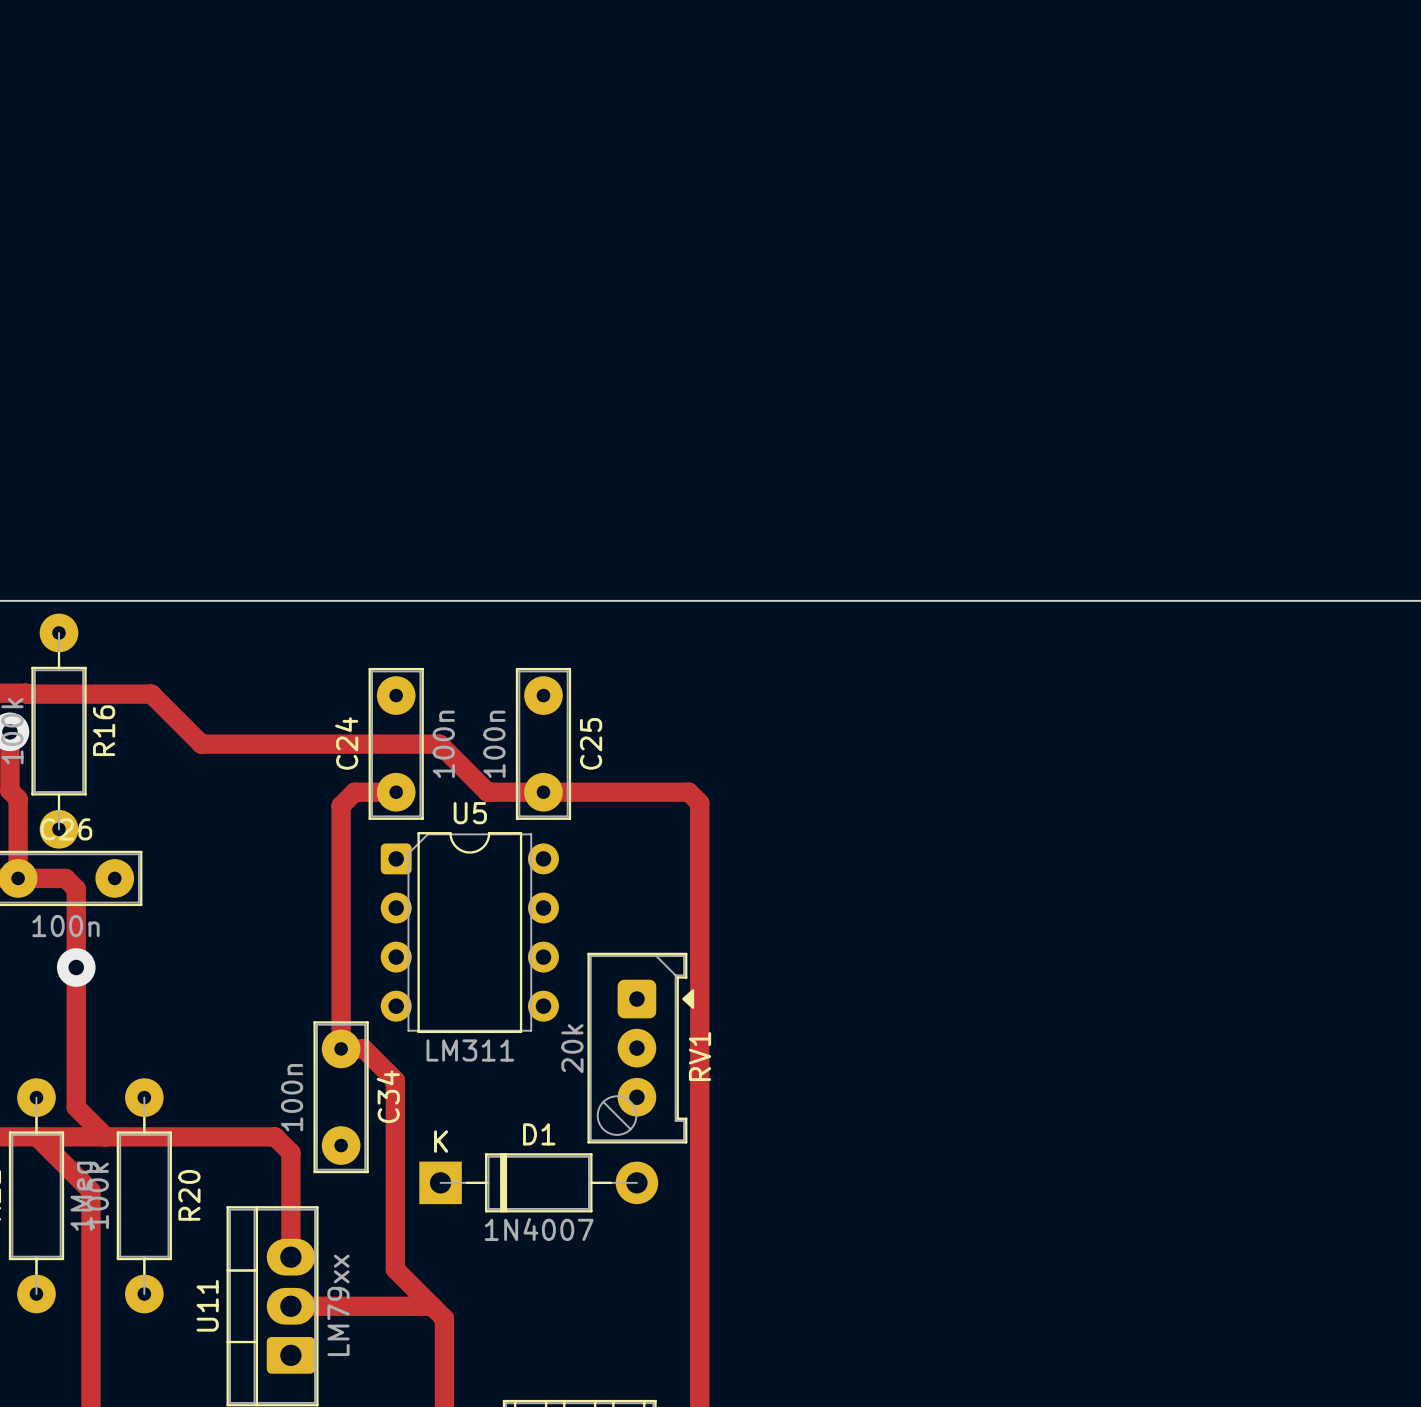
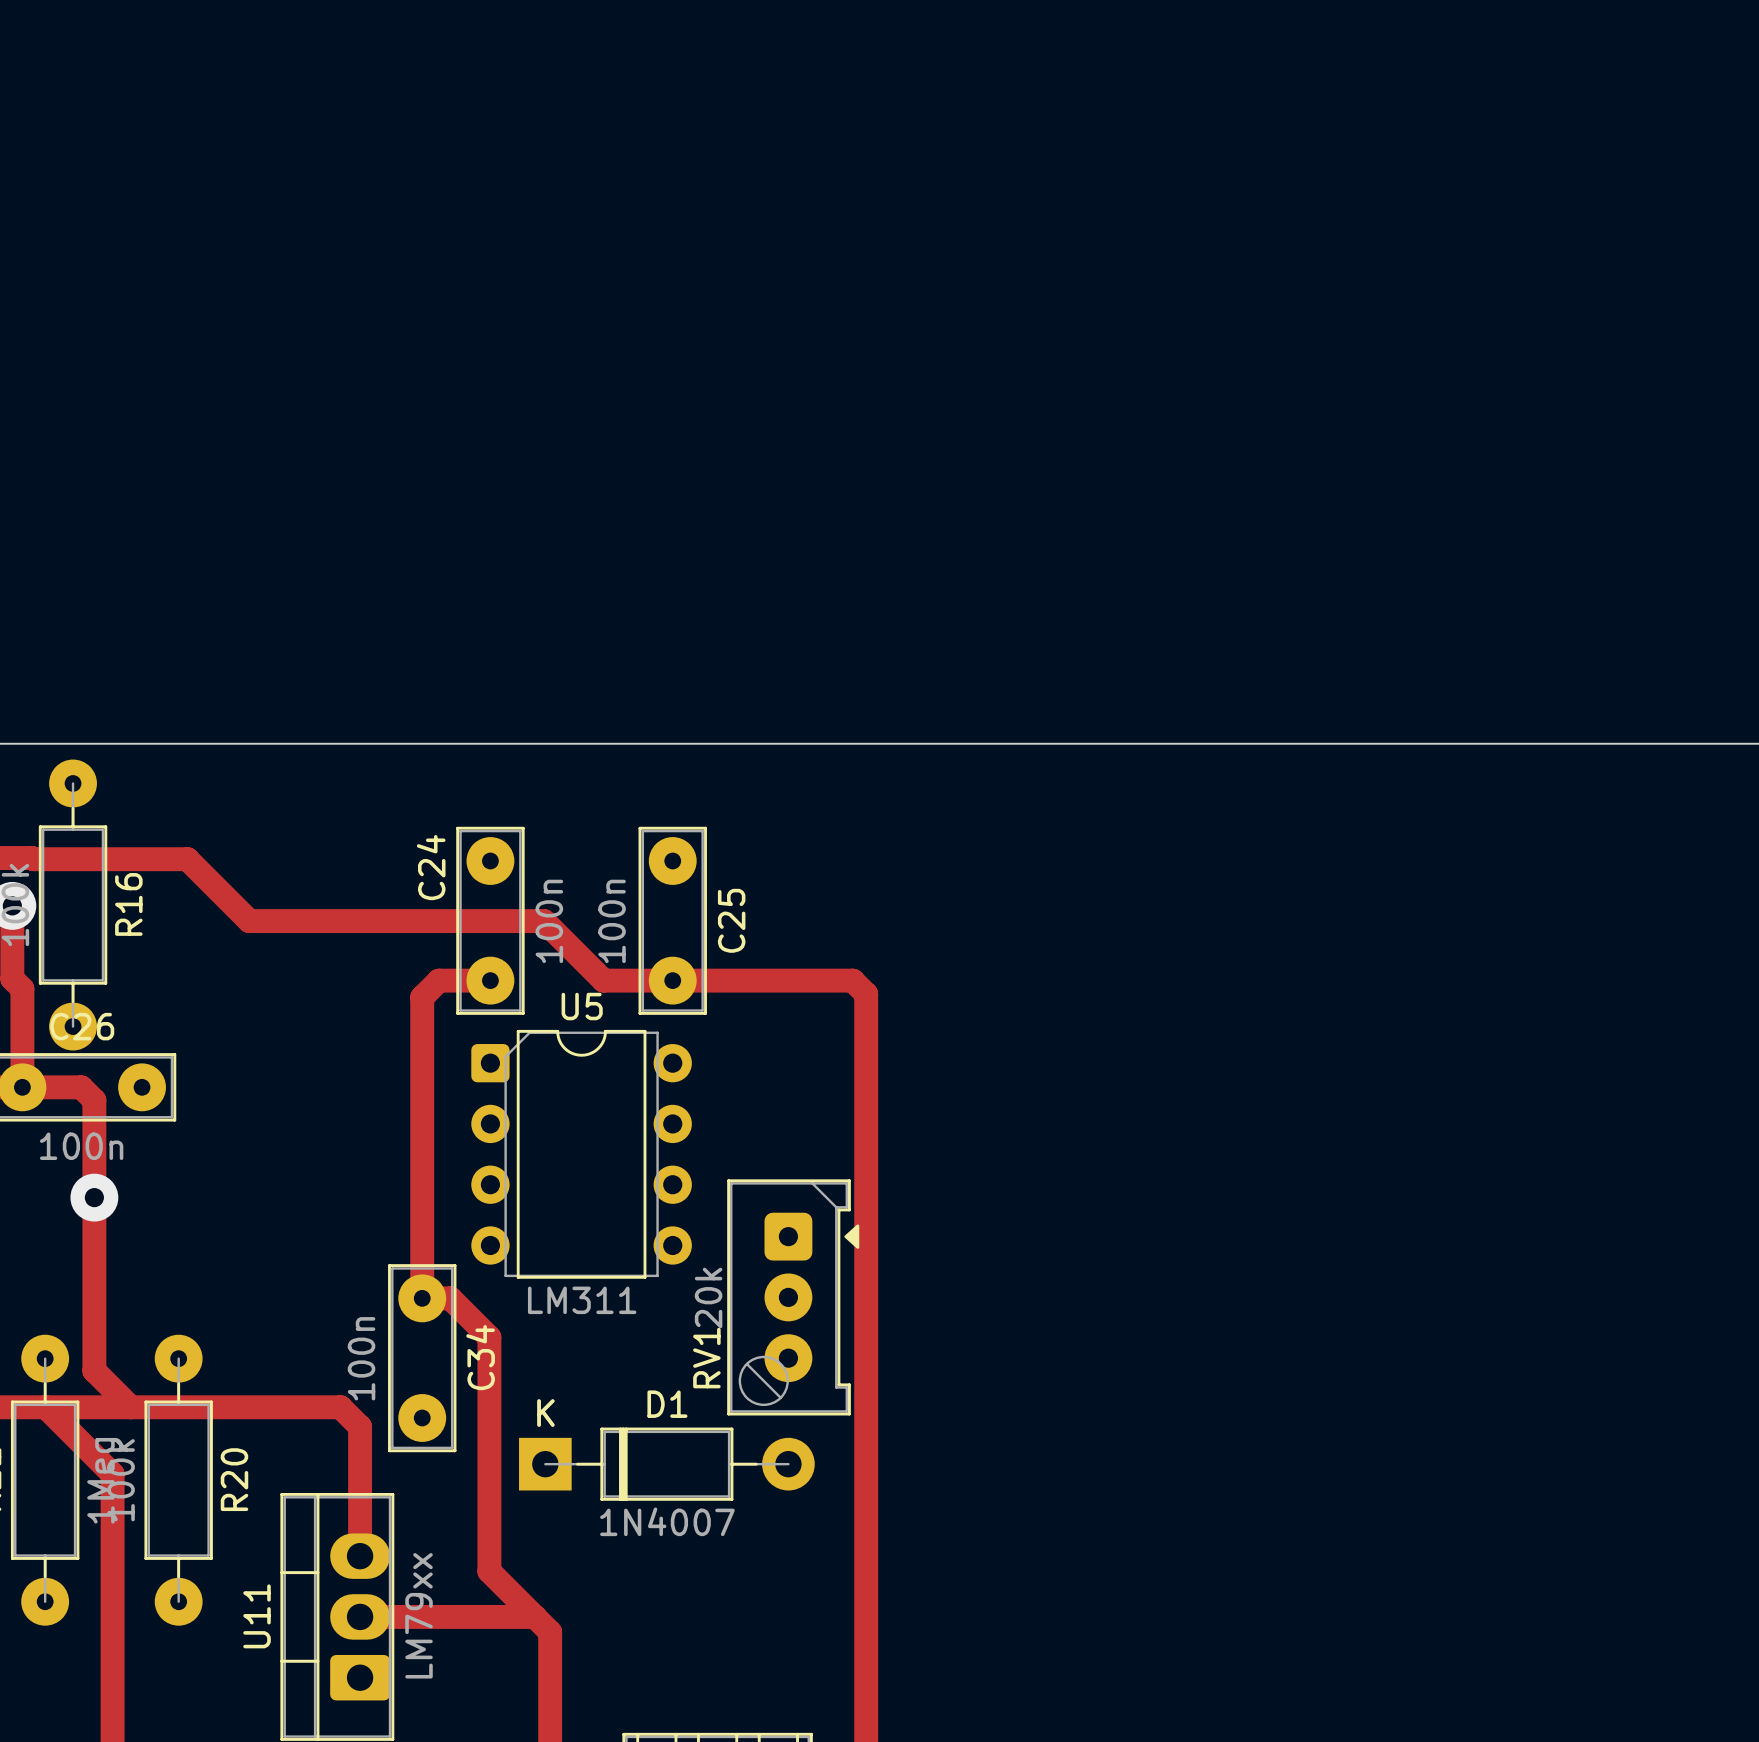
C24 name position: C24 (346, 743) -> C24 (431, 867)
RV1 name position: RV1 (700, 1056) -> RV1 (706, 1358)

